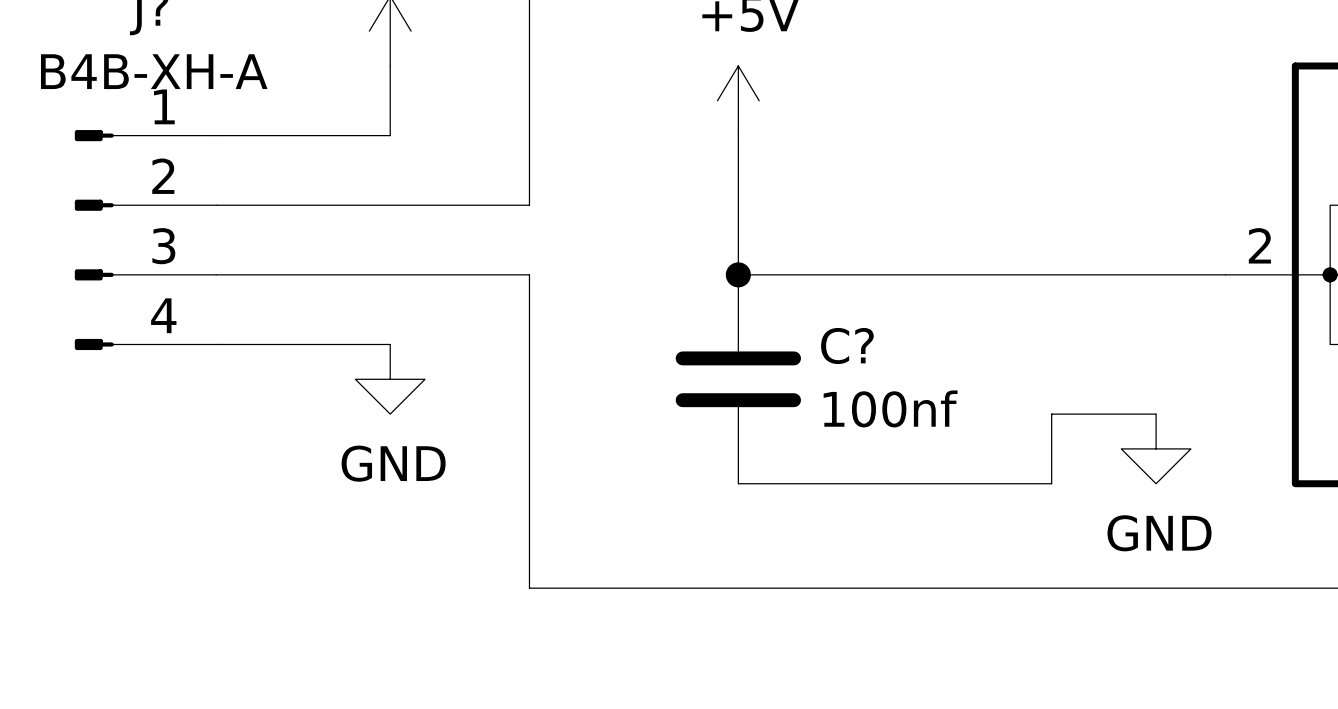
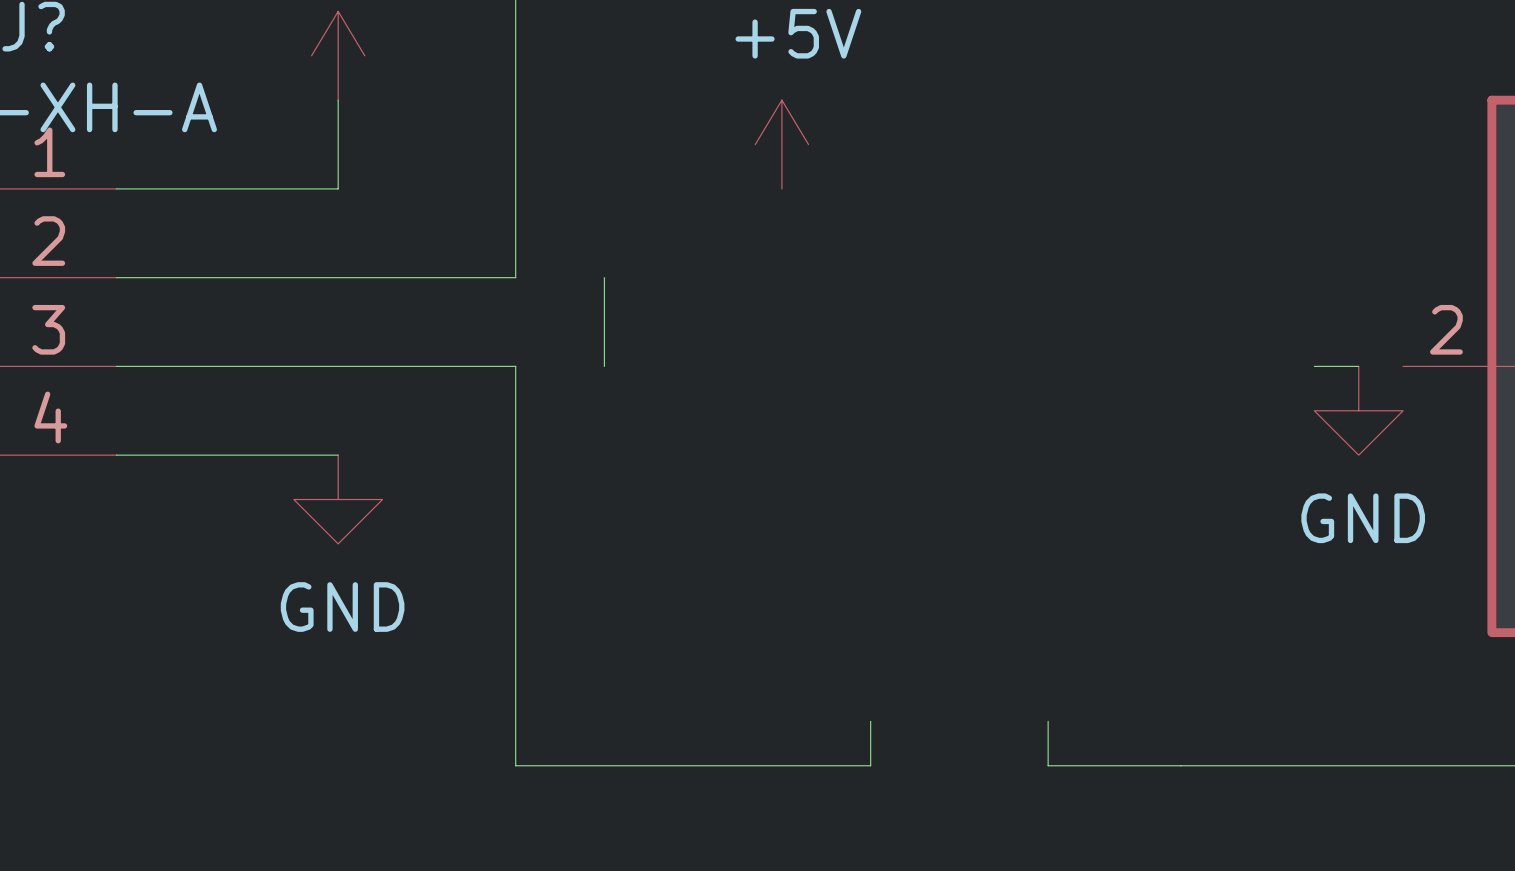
wire: (738, 135) (738, 274) (1156, 274) -> none
wire: none -> (604, 277) (604, 366)
junction: (738, 274) -> none
wire: (1190, 274) (1225, 274) -> none
C?: 100nf (738, 379) -> none
wire: (1156, 414) (1051, 414) (1051, 483) (738, 483) -> none
power symbol position: GND (1156, 448) -> GND (1358, 410)
wire: none -> (1048, 721) (1048, 765)
wire: (807, 588) (947, 588) -> (870, 765) (870, 721)

